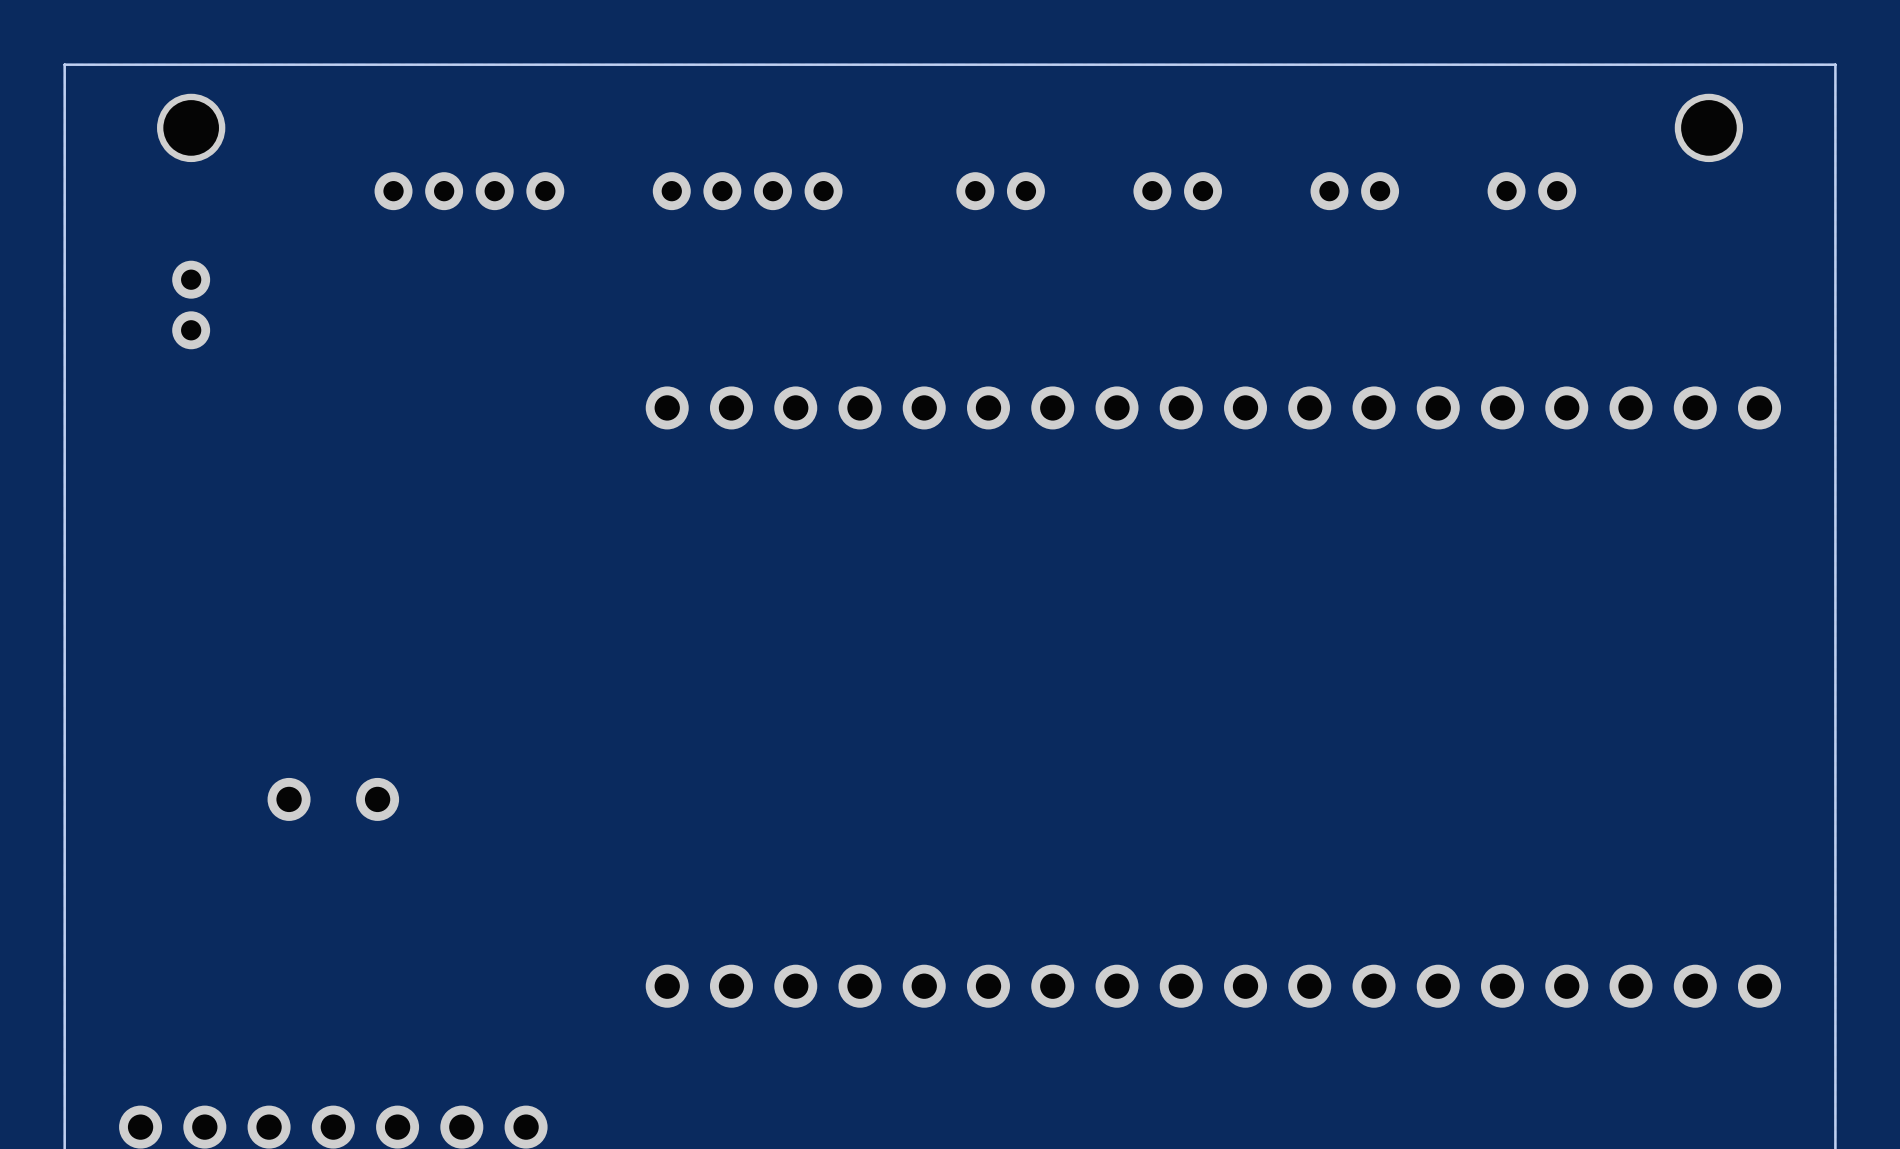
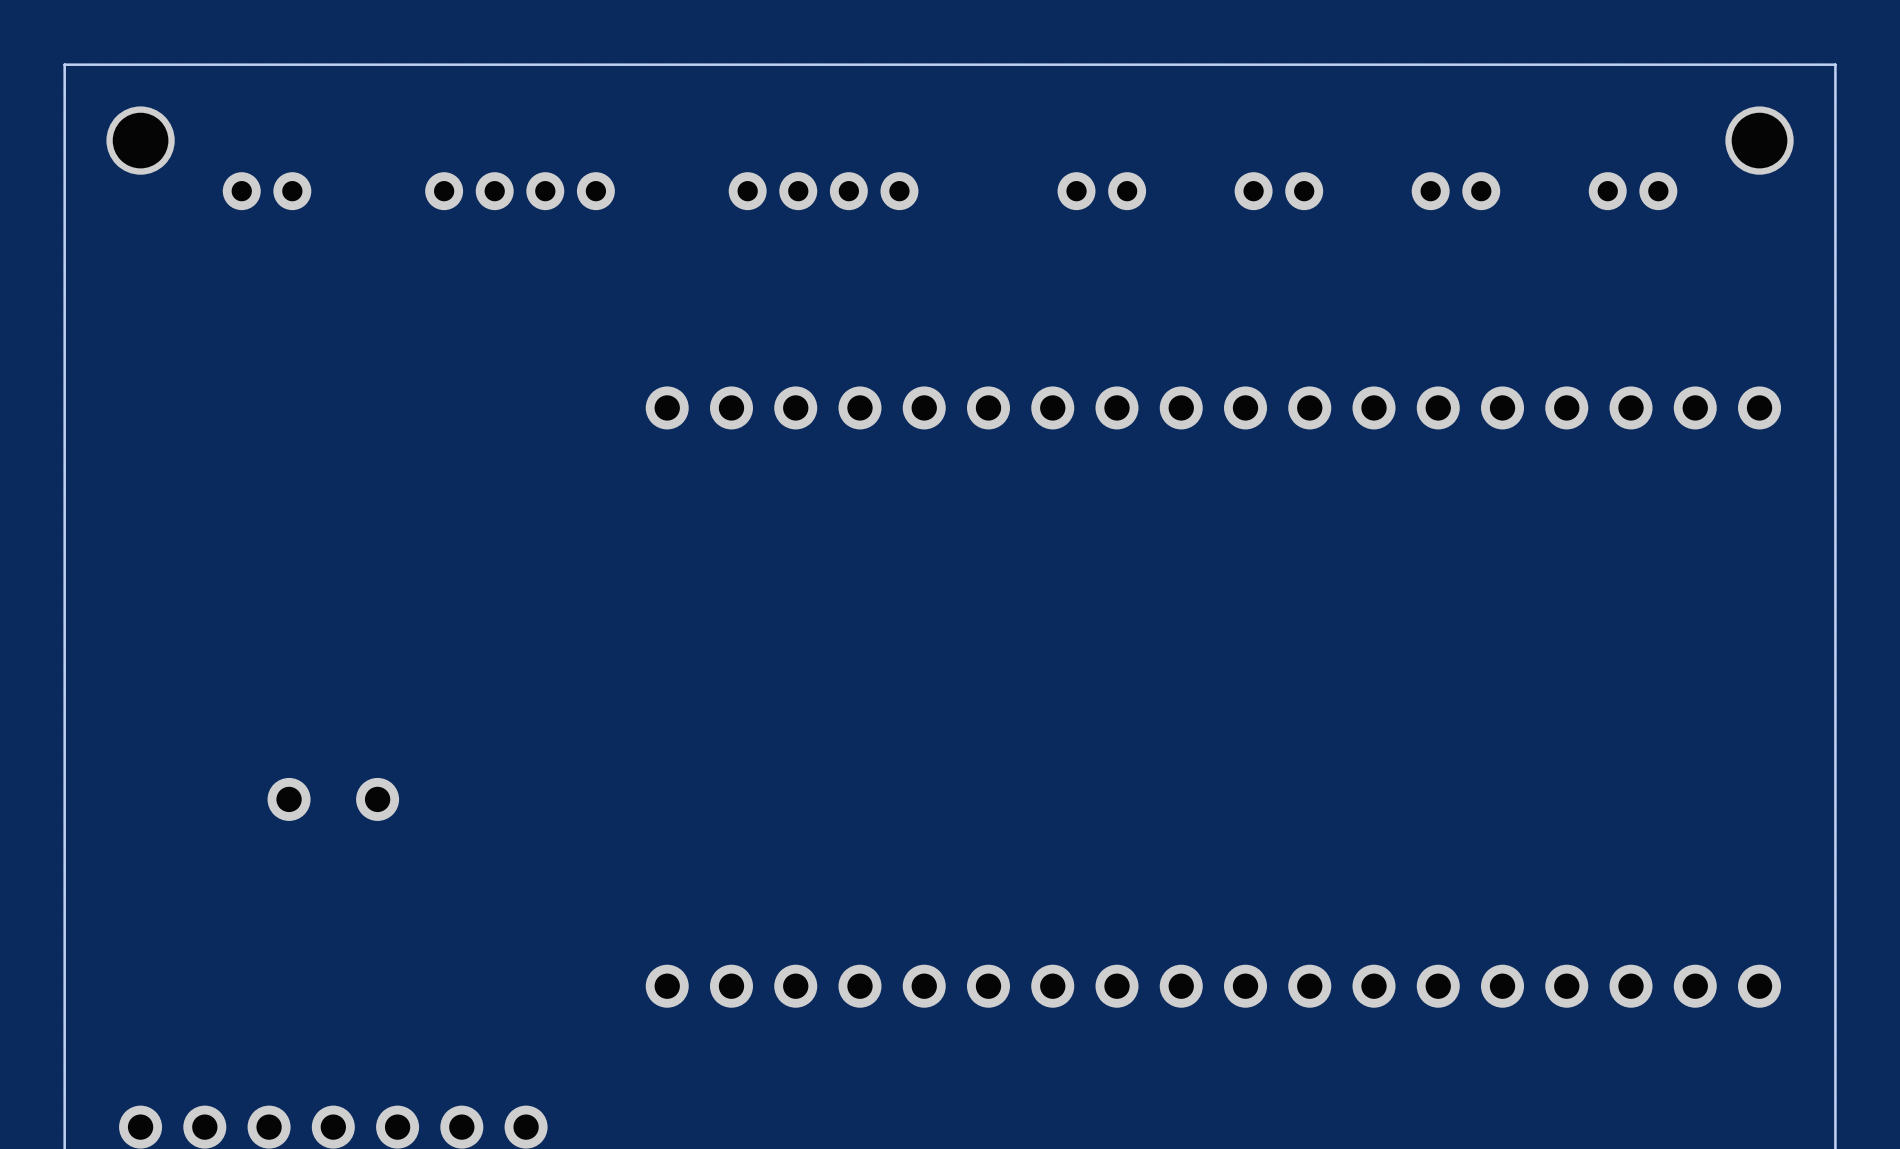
part position: (191, 127) -> (140, 140)
part position: (1708, 127) -> (1759, 140)
part position: (469, 191) -> (520, 191)
part position: (747, 191) -> (823, 191)
part: (1000, 191) -> none
part: none -> (1101, 191)
part: (1177, 191) -> none
part: none -> (1278, 191)
part: (1354, 191) -> none
part: none -> (1455, 191)
part: (1531, 191) -> none
part: none -> (1633, 191)
part rotation: 0° (191, 304) -> 90° clockwise (267, 191)
part position: (191, 304) -> (267, 191)

